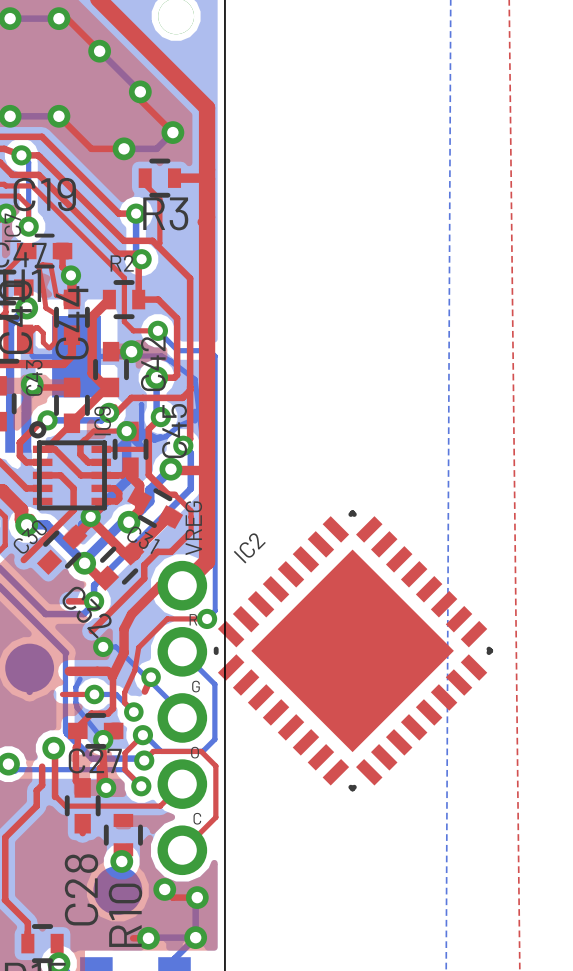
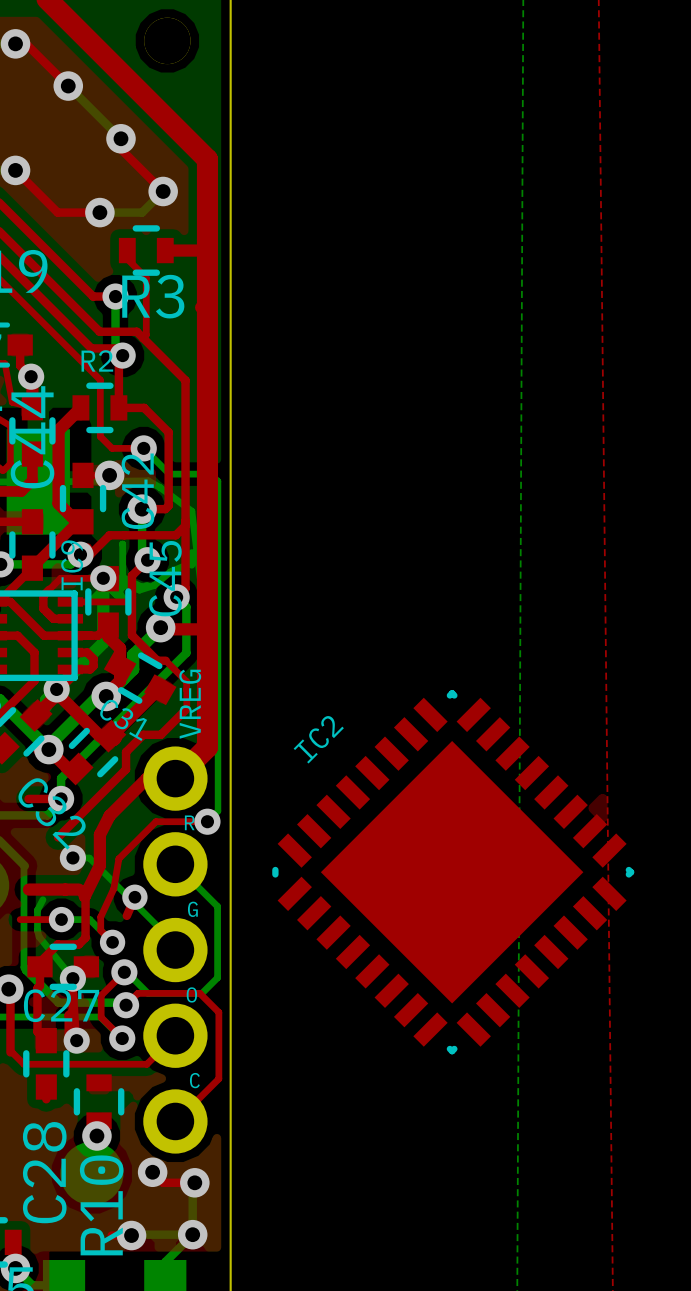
IC2 position: (353, 650) -> (453, 872)

